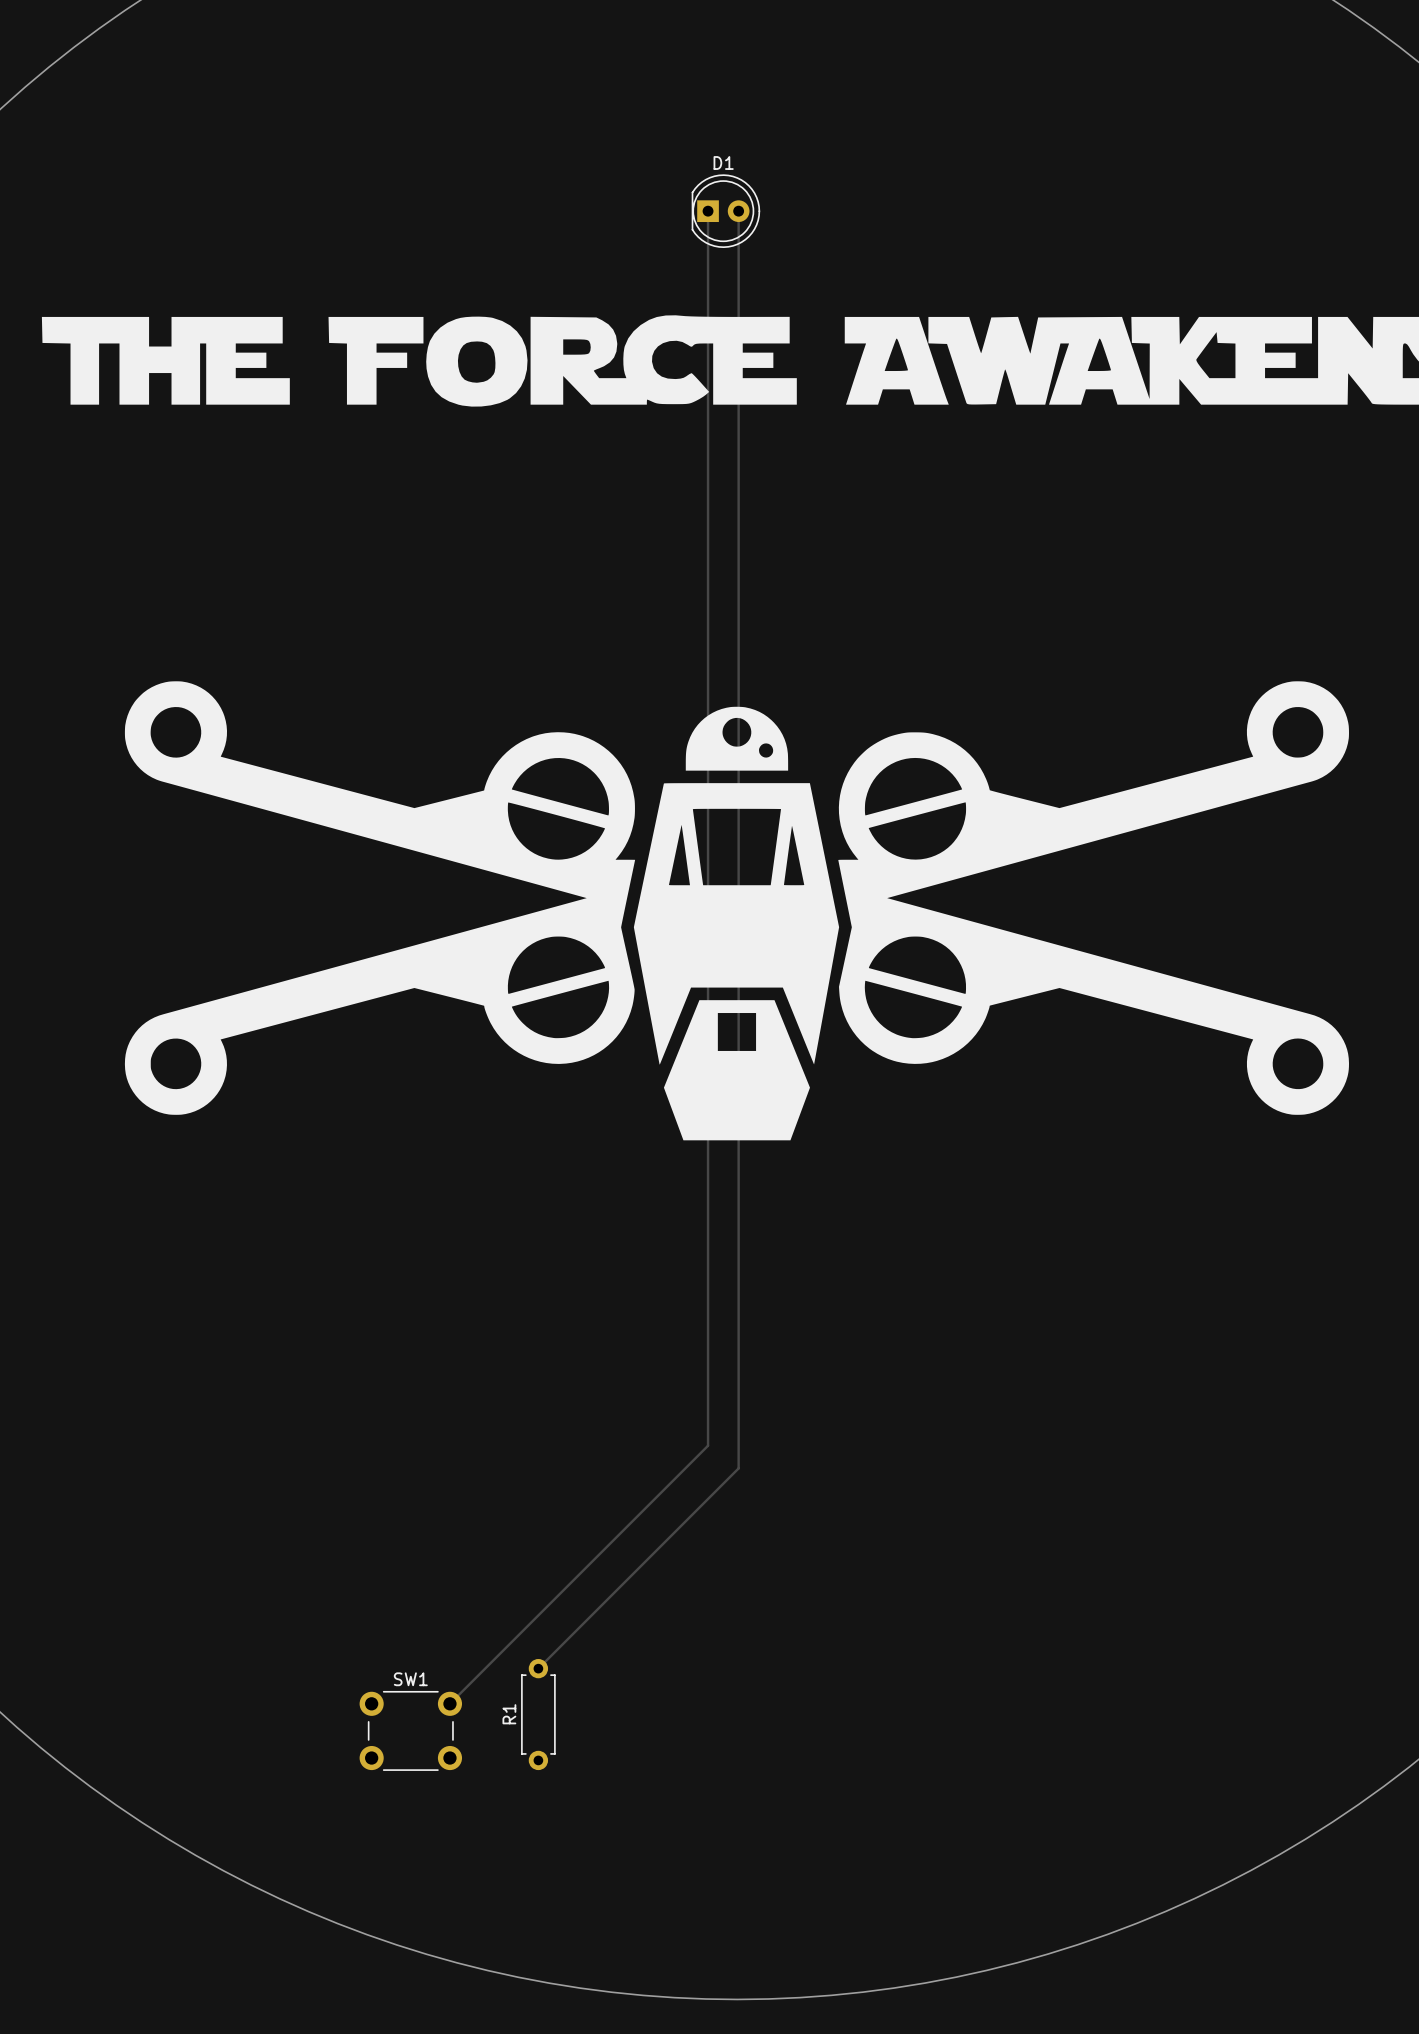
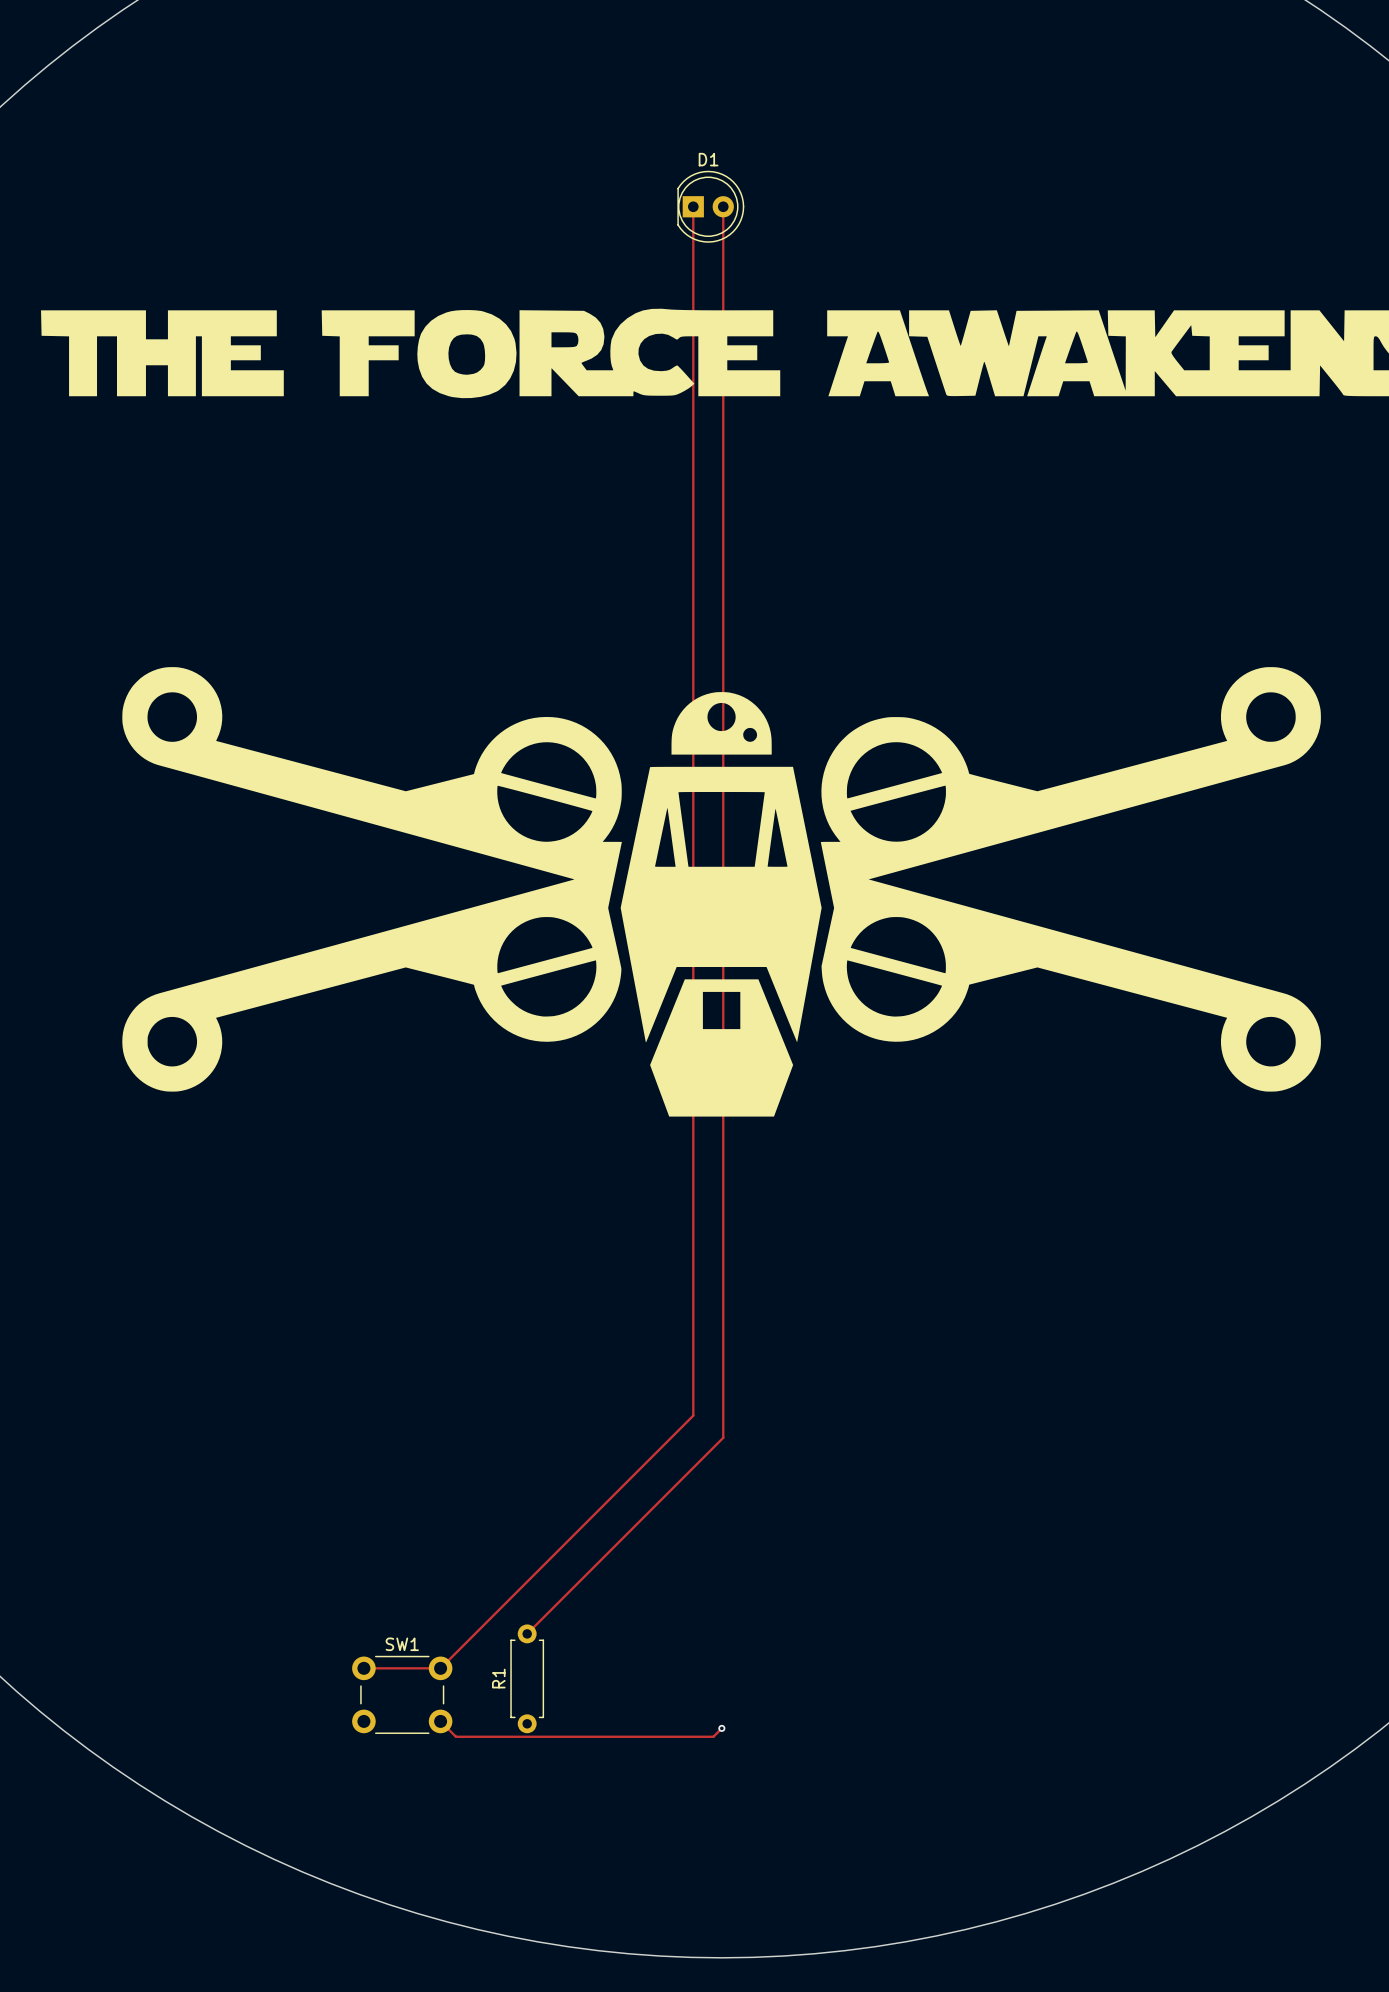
track: none -> (363, 1668) (440, 1668)
track: none -> (440, 1721) (455, 1736) (713, 1736) (721, 1728)
via: none -> (721, 1728)

